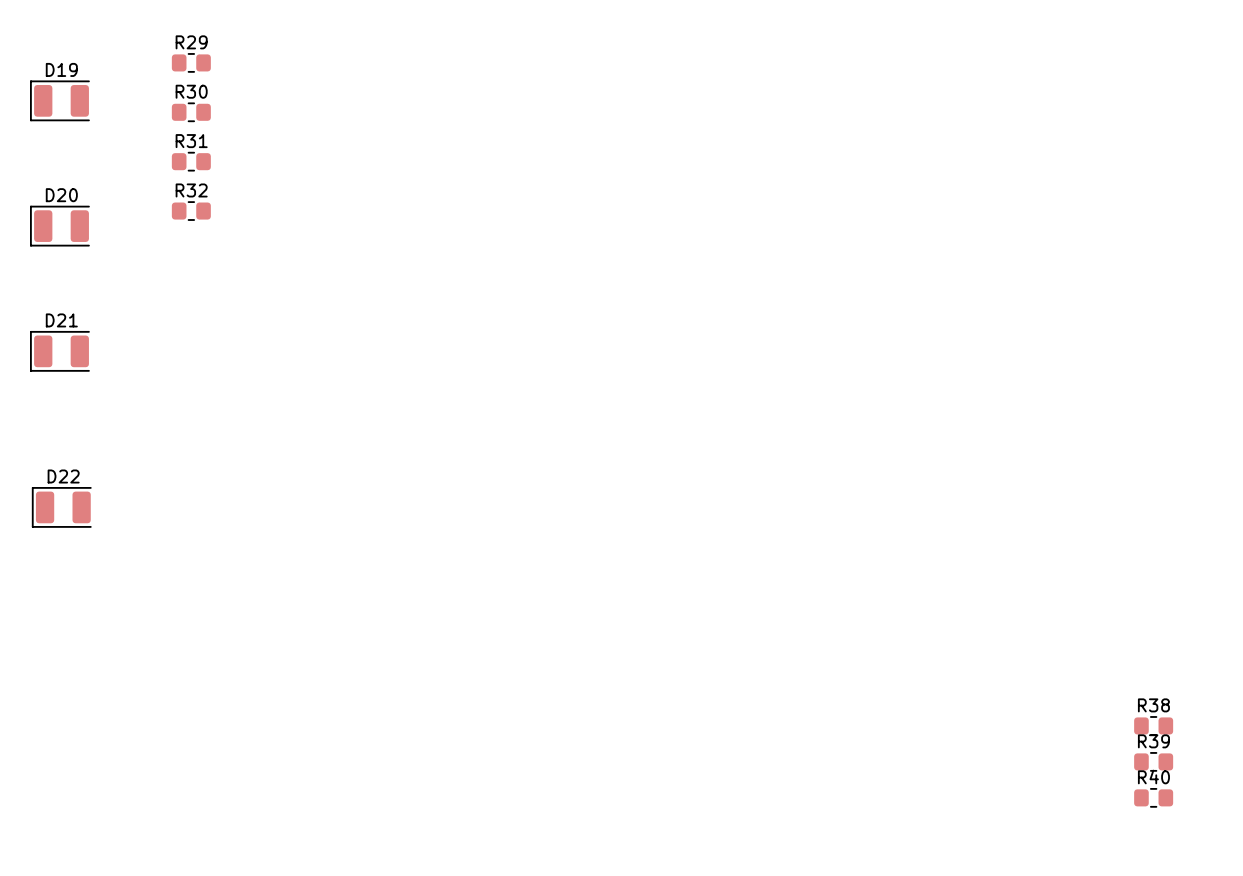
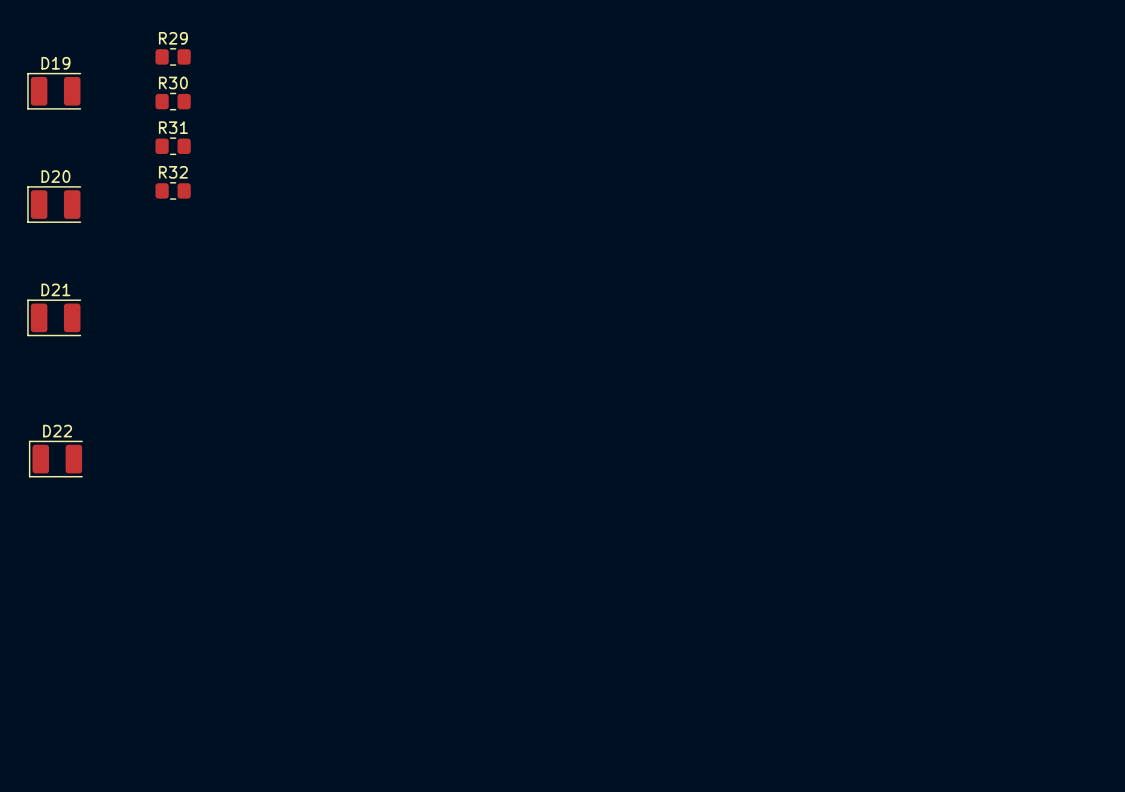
R38: (1153, 725) -> none
R39: (1153, 761) -> none
R40: (1153, 797) -> none

